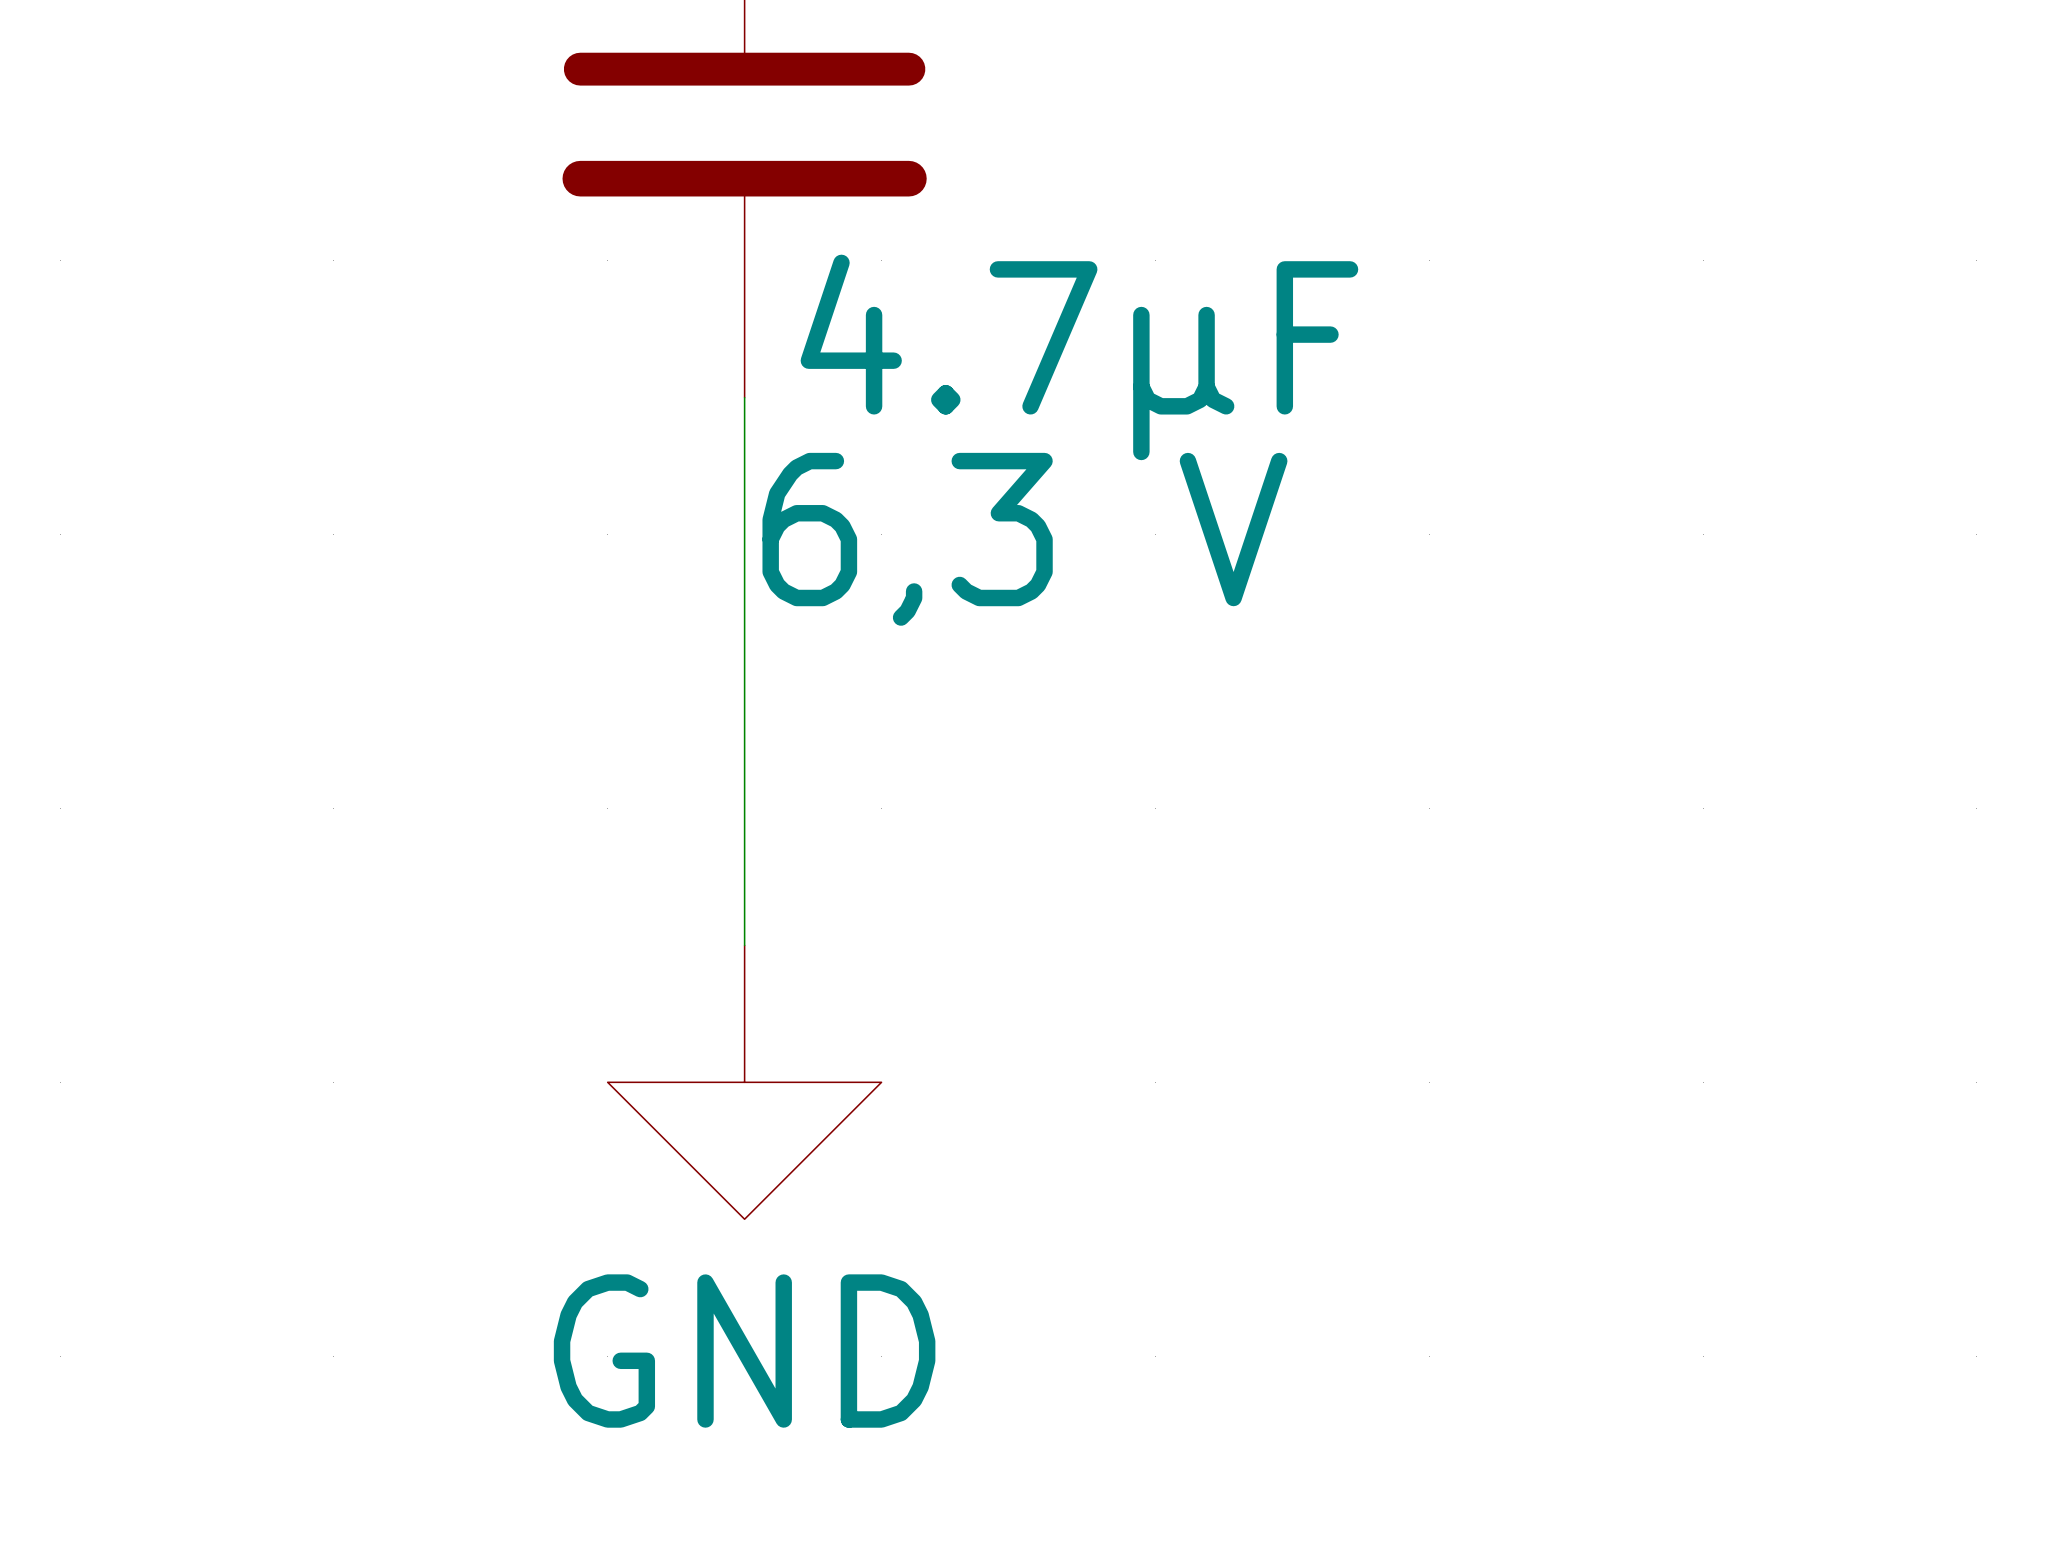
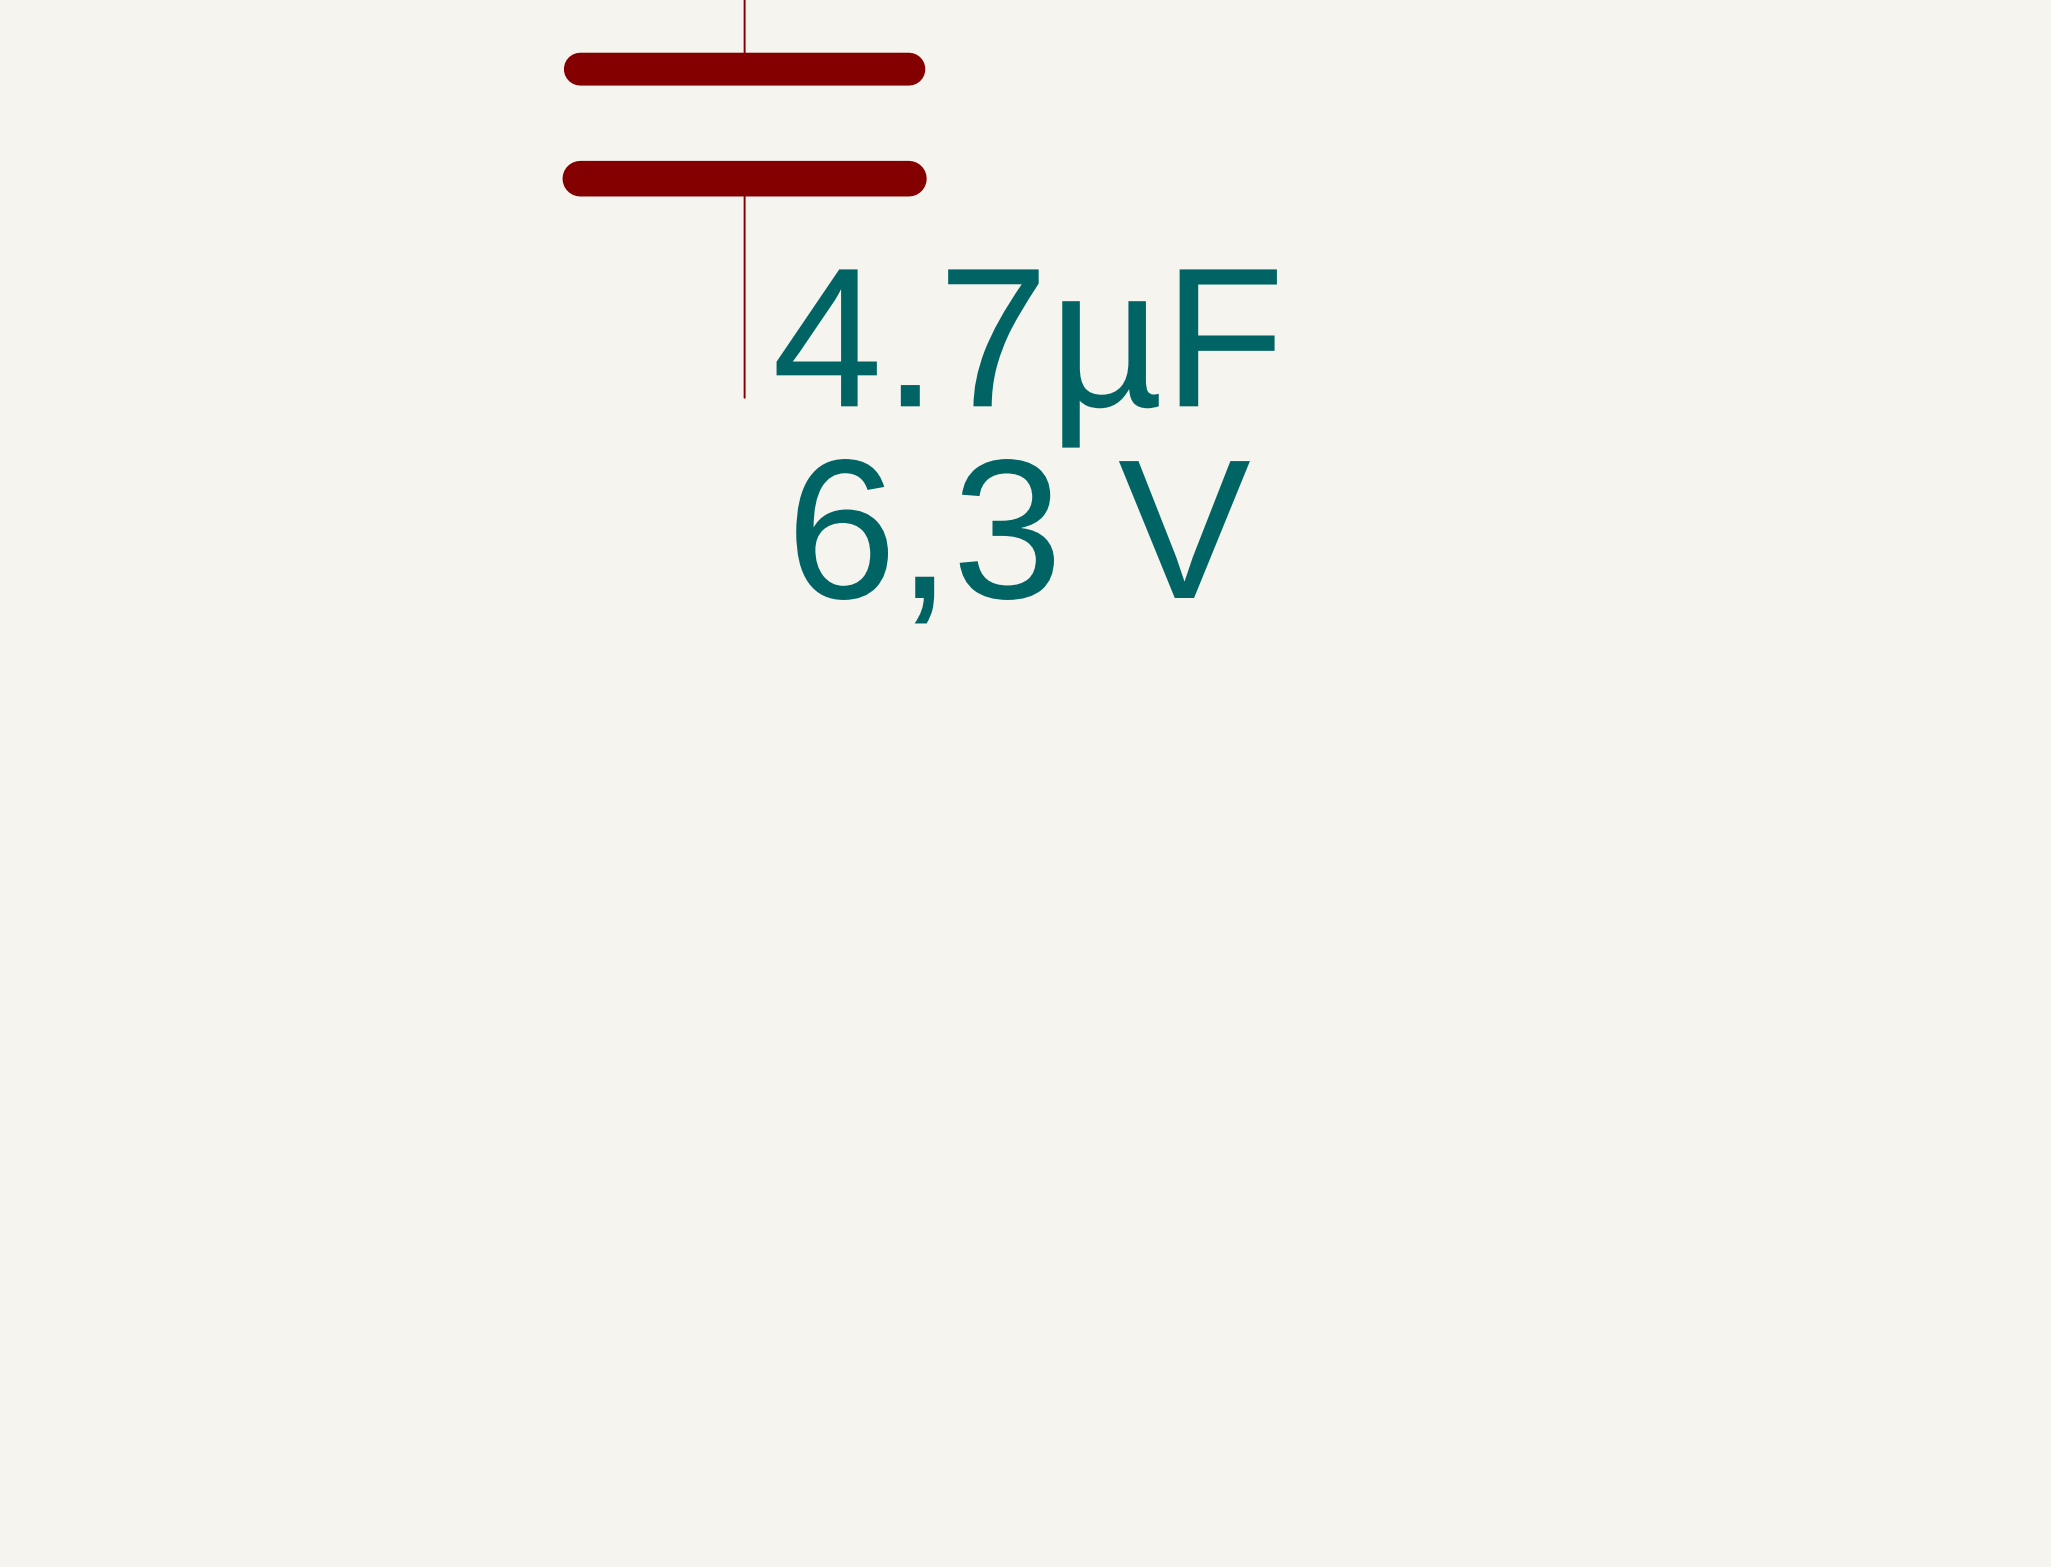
wire: (744, 397) (744, 945) -> none
power symbol: GND (744, 1082) -> none

